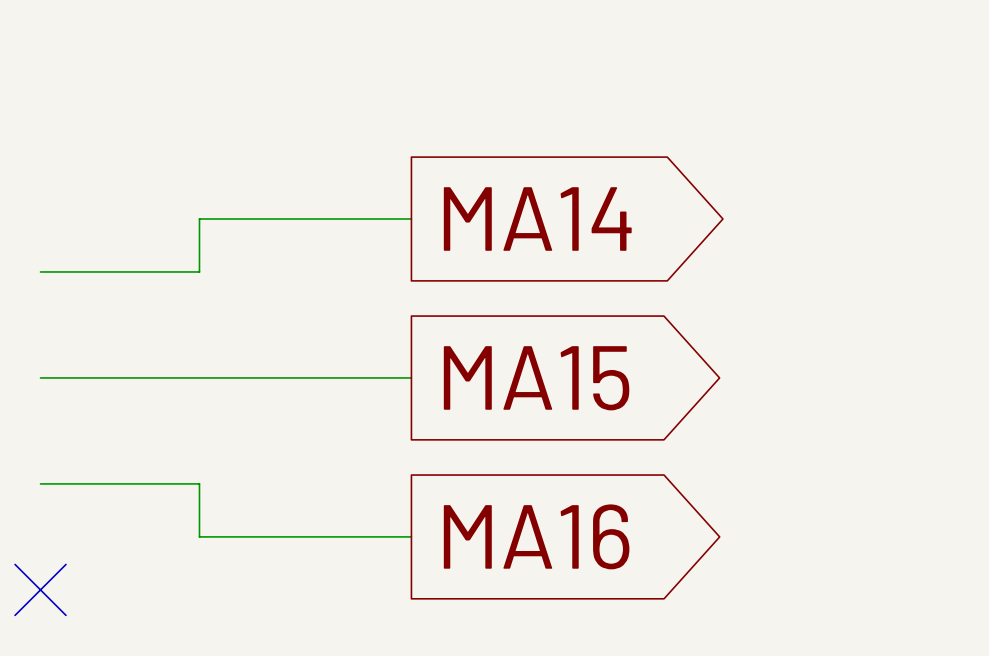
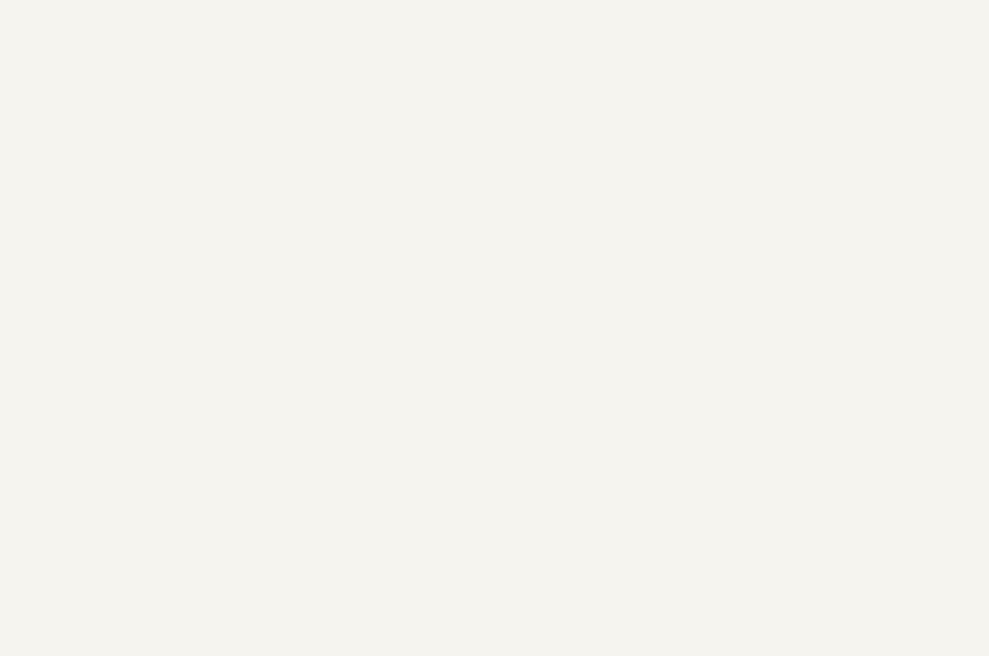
wire: (411, 218) (199, 218) (199, 271) (40, 271) -> none
global label: MA14 (537, 218) -> none
wire: (40, 377) (411, 377) -> none
global label: MA15 (536, 378) -> none
wire: (40, 483) (199, 483) (199, 536) (411, 536) -> none
global label: MA16 (536, 536) -> none
no-connect mark: (40, 589) -> none

